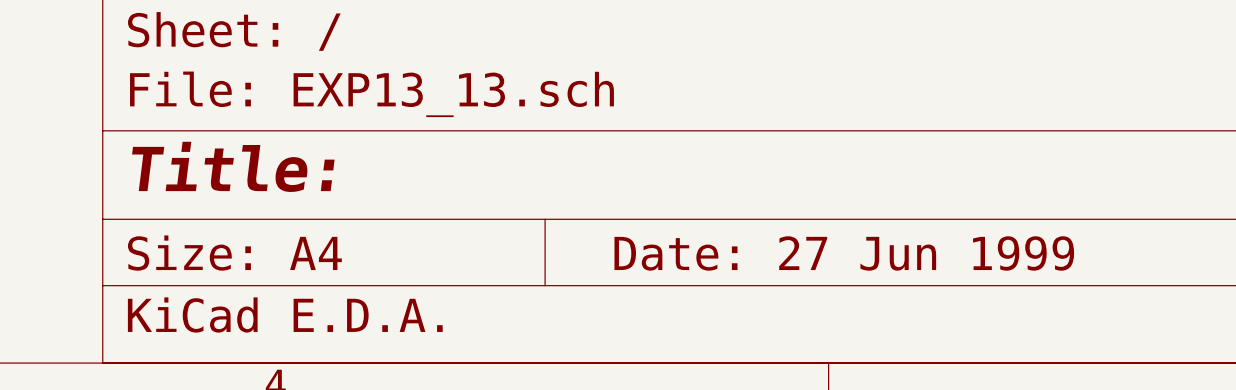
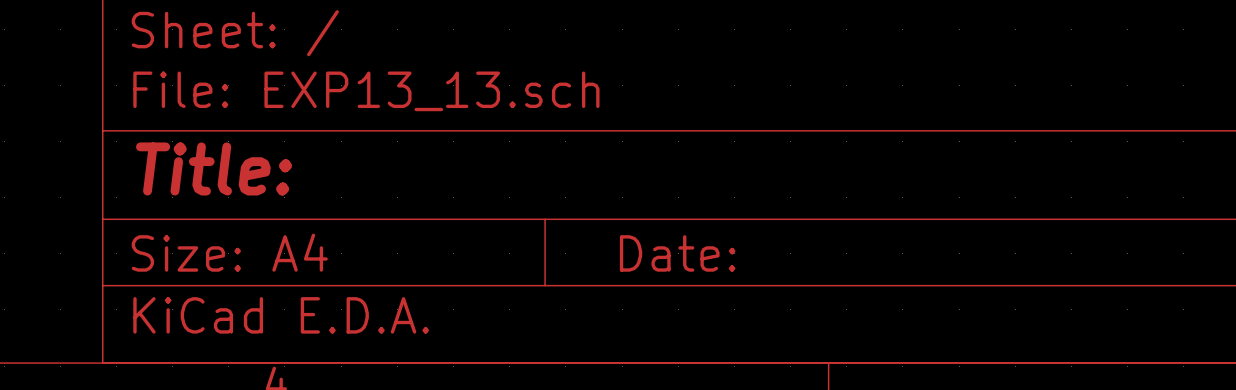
title block: Date: 27 Jun 1999 (844, 253) -> Date: (677, 253)

